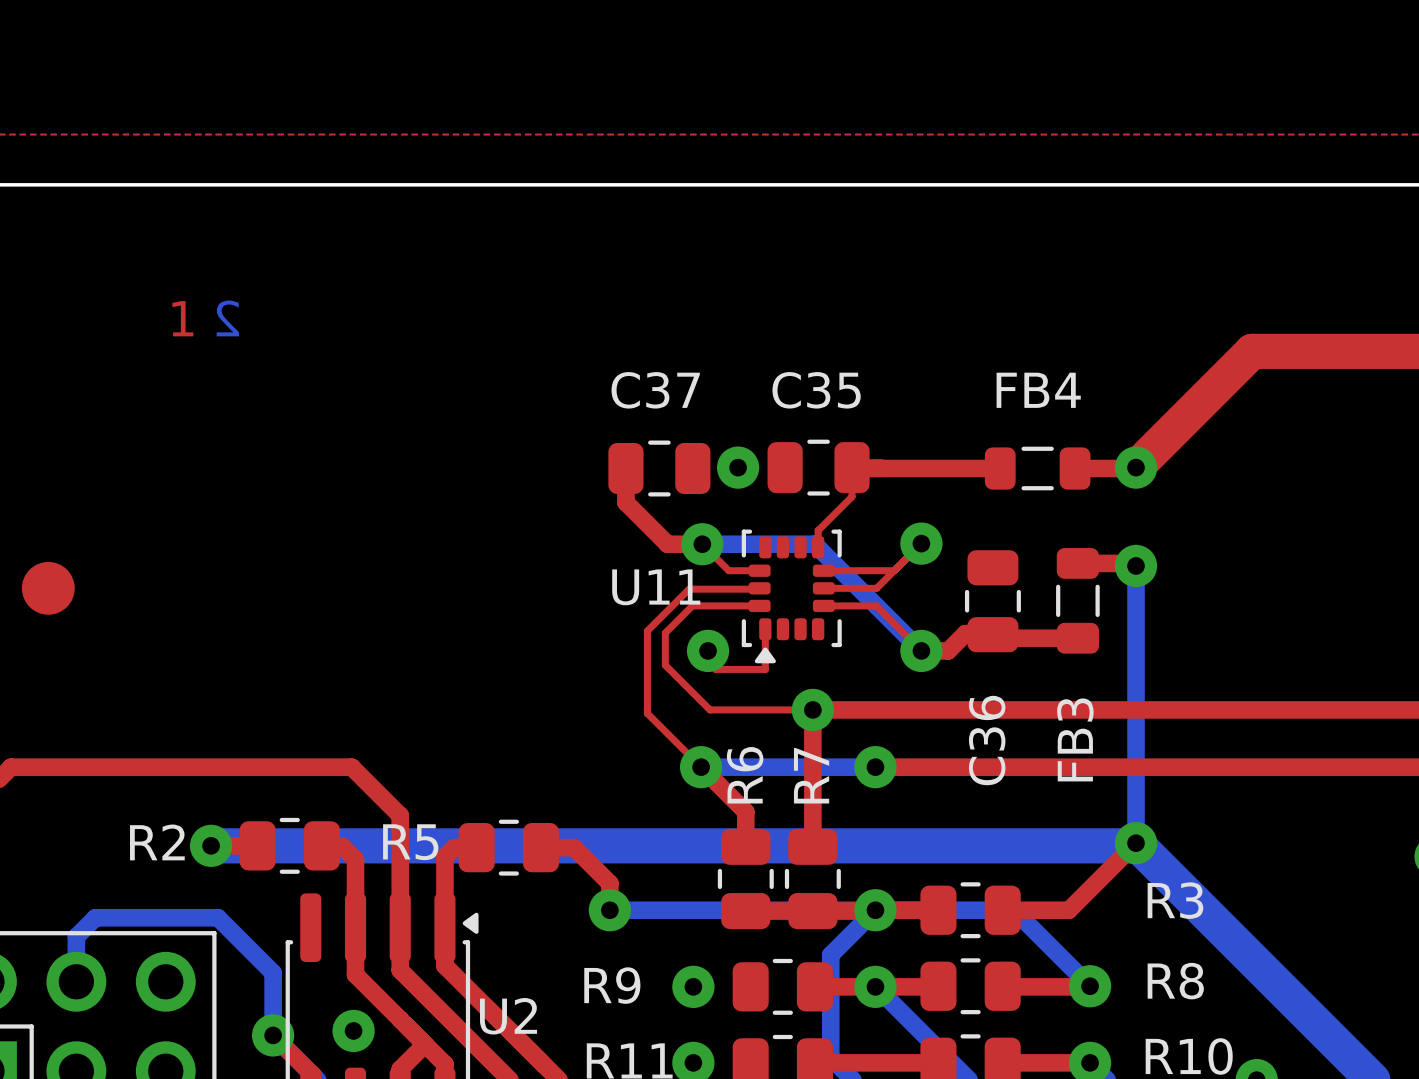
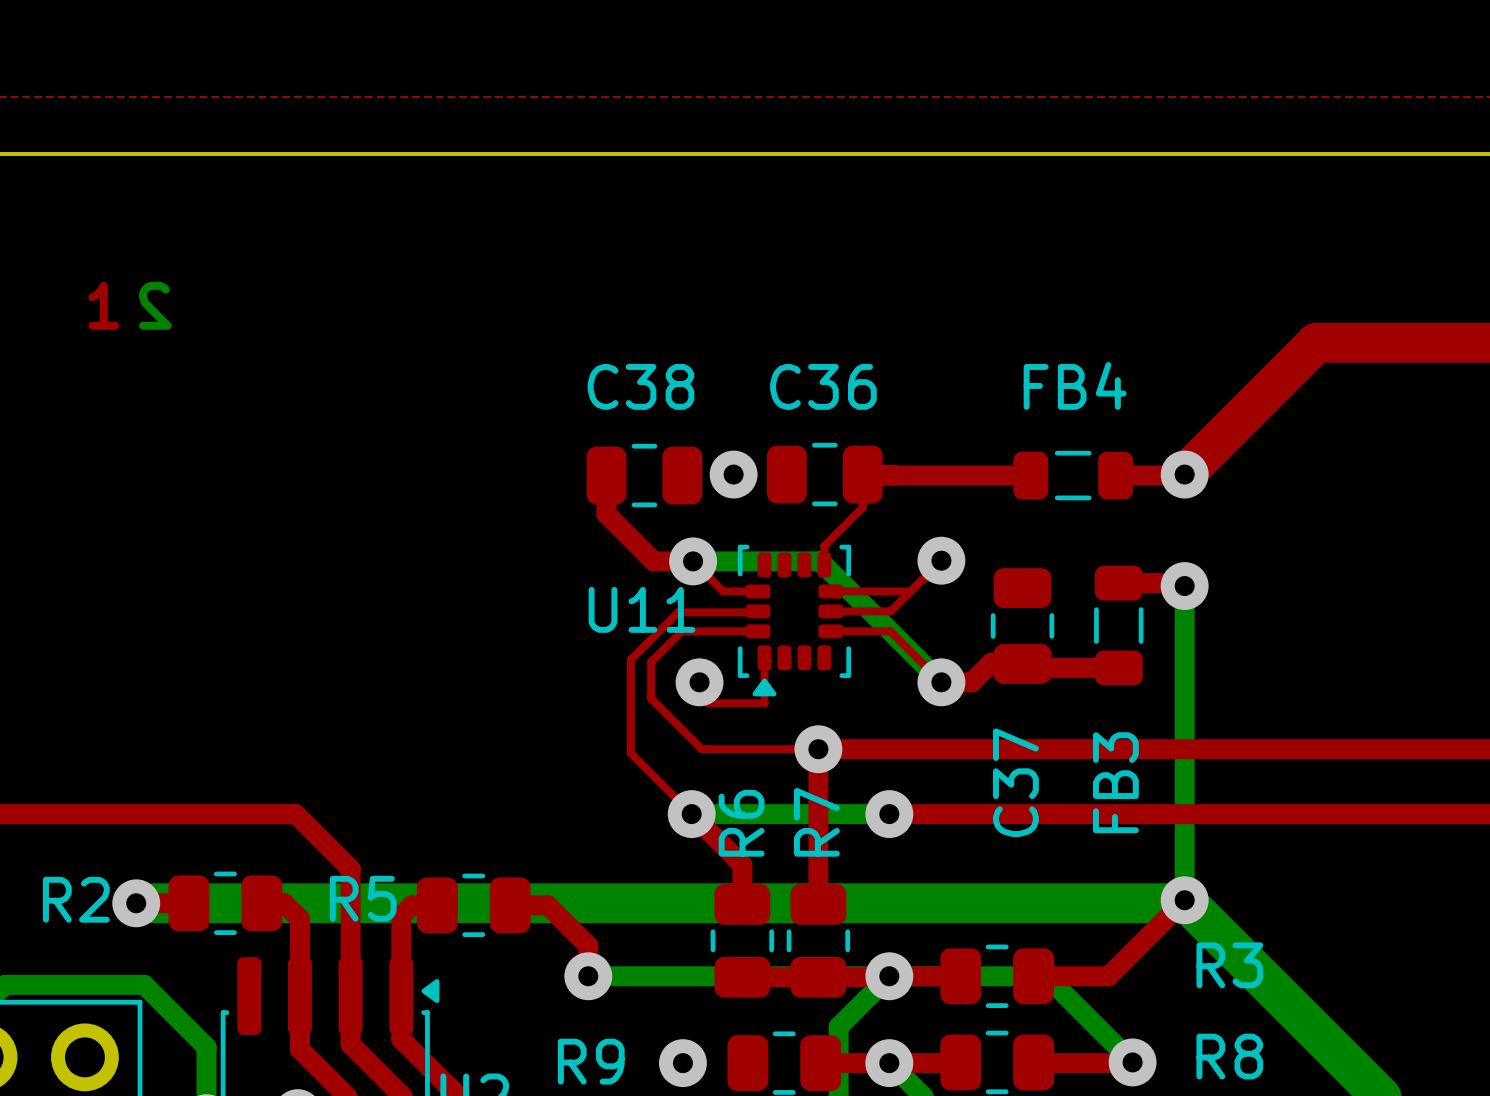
C37 name: C37 (655, 390) -> C38 (641, 386)
C35 name: C35 (816, 390) -> C36 (823, 386)
C36 name: C36 (987, 740) -> C37 (1015, 782)

